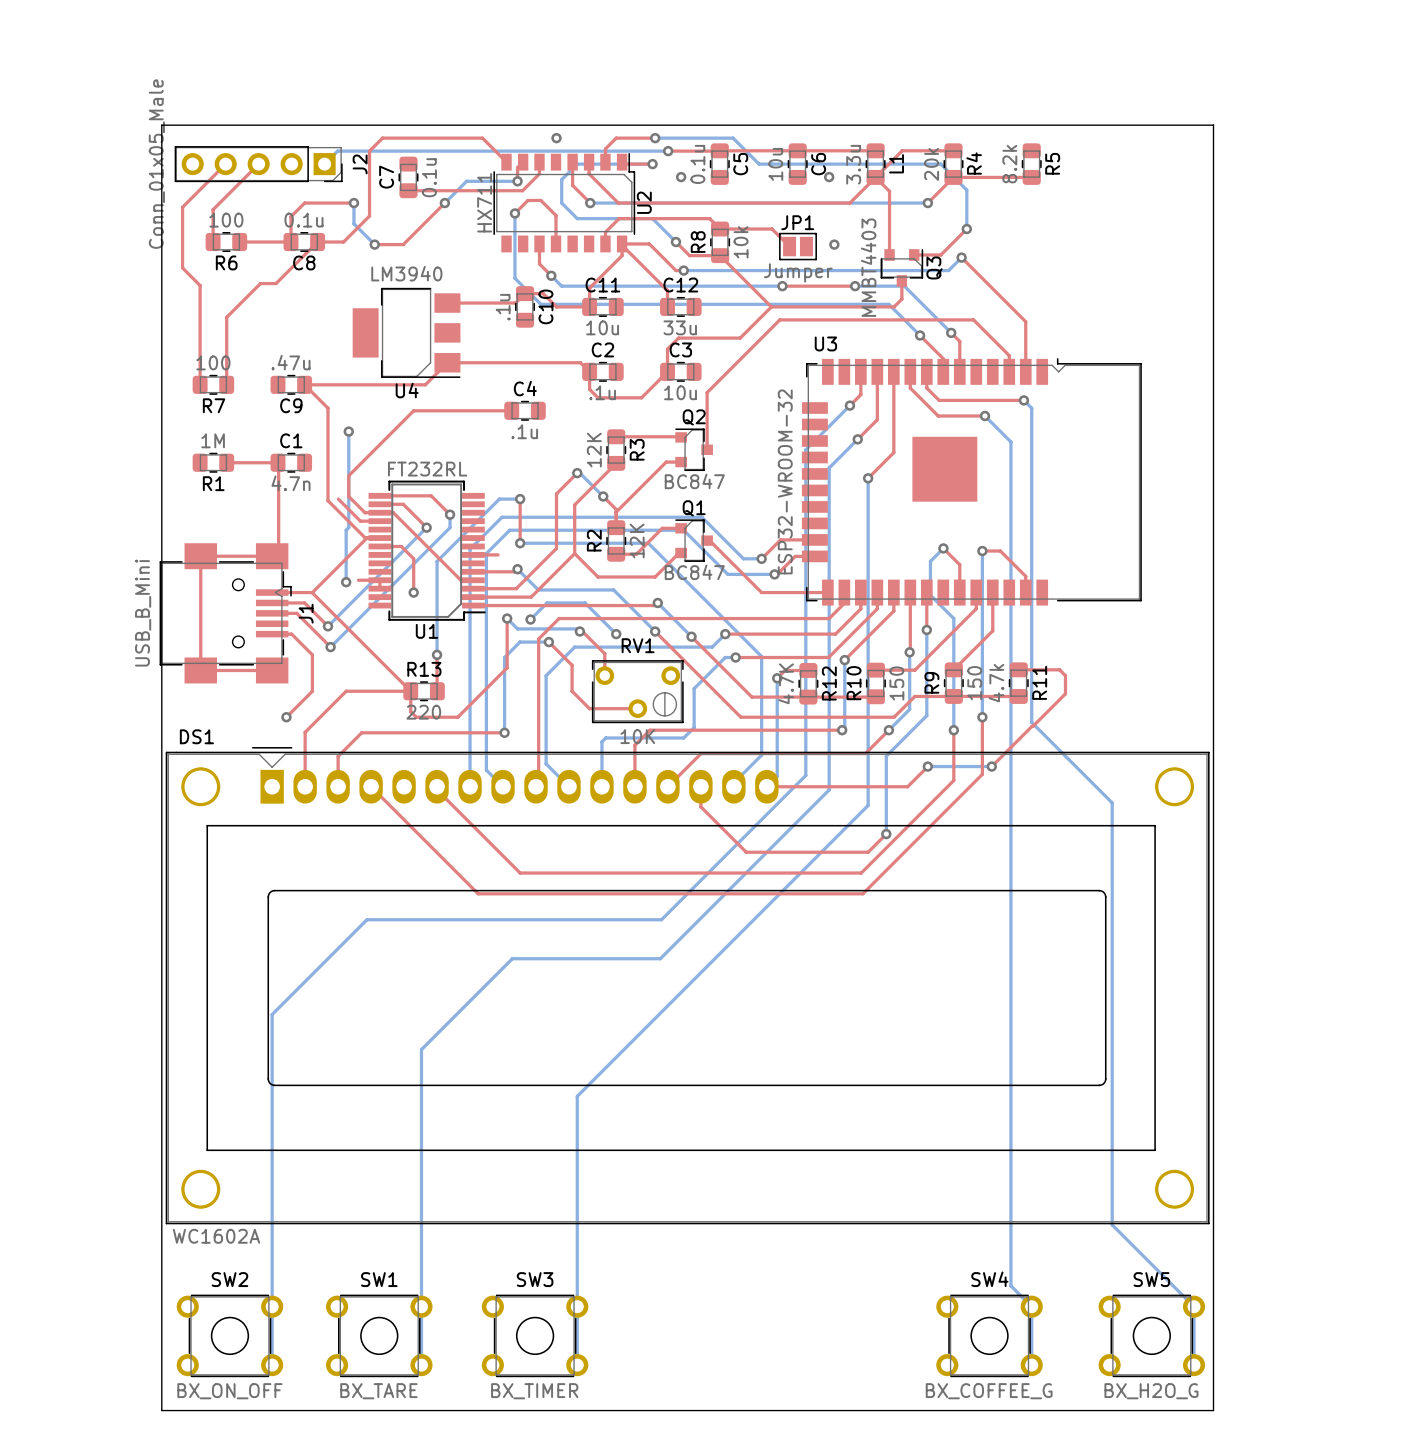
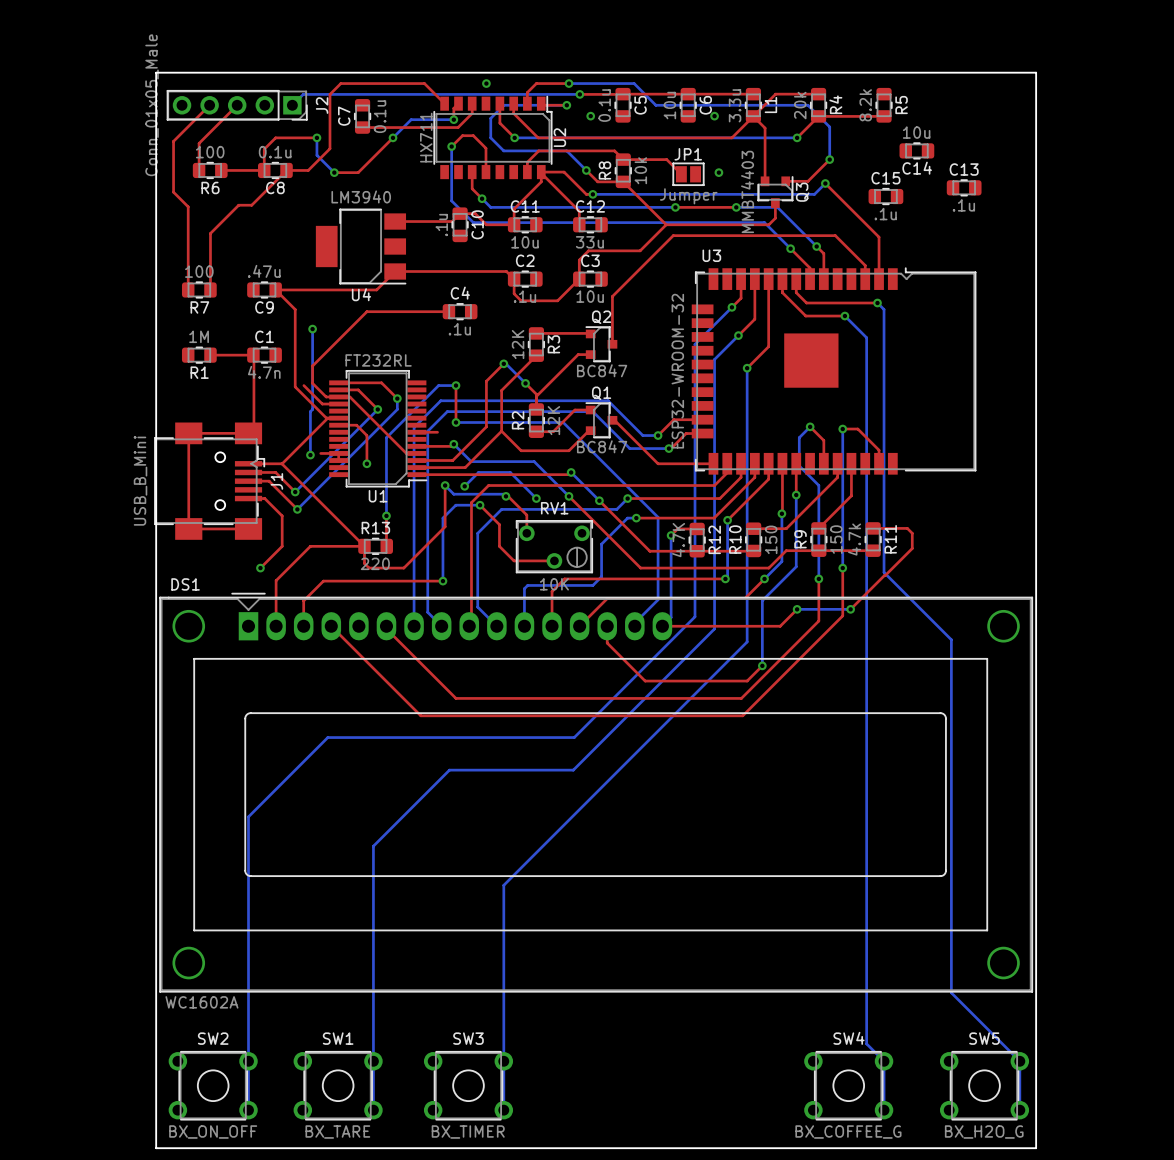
C14: none -> 10u (916, 150)
C13: none -> .1u (964, 187)
C15: none -> .1u (885, 196)

